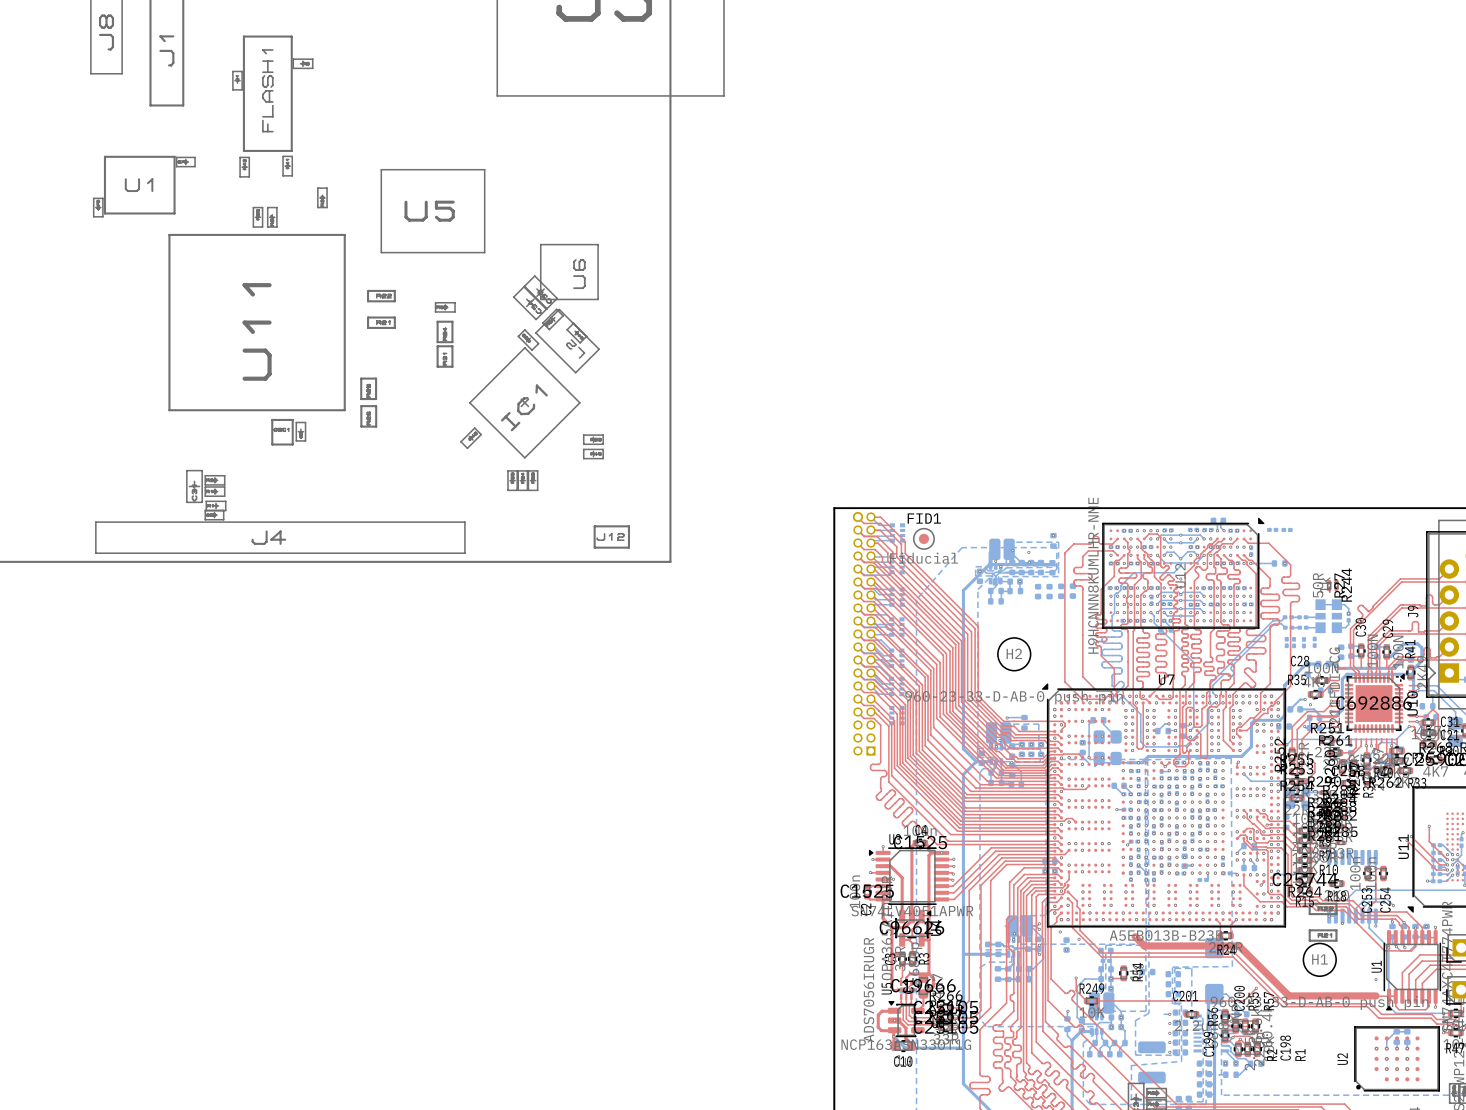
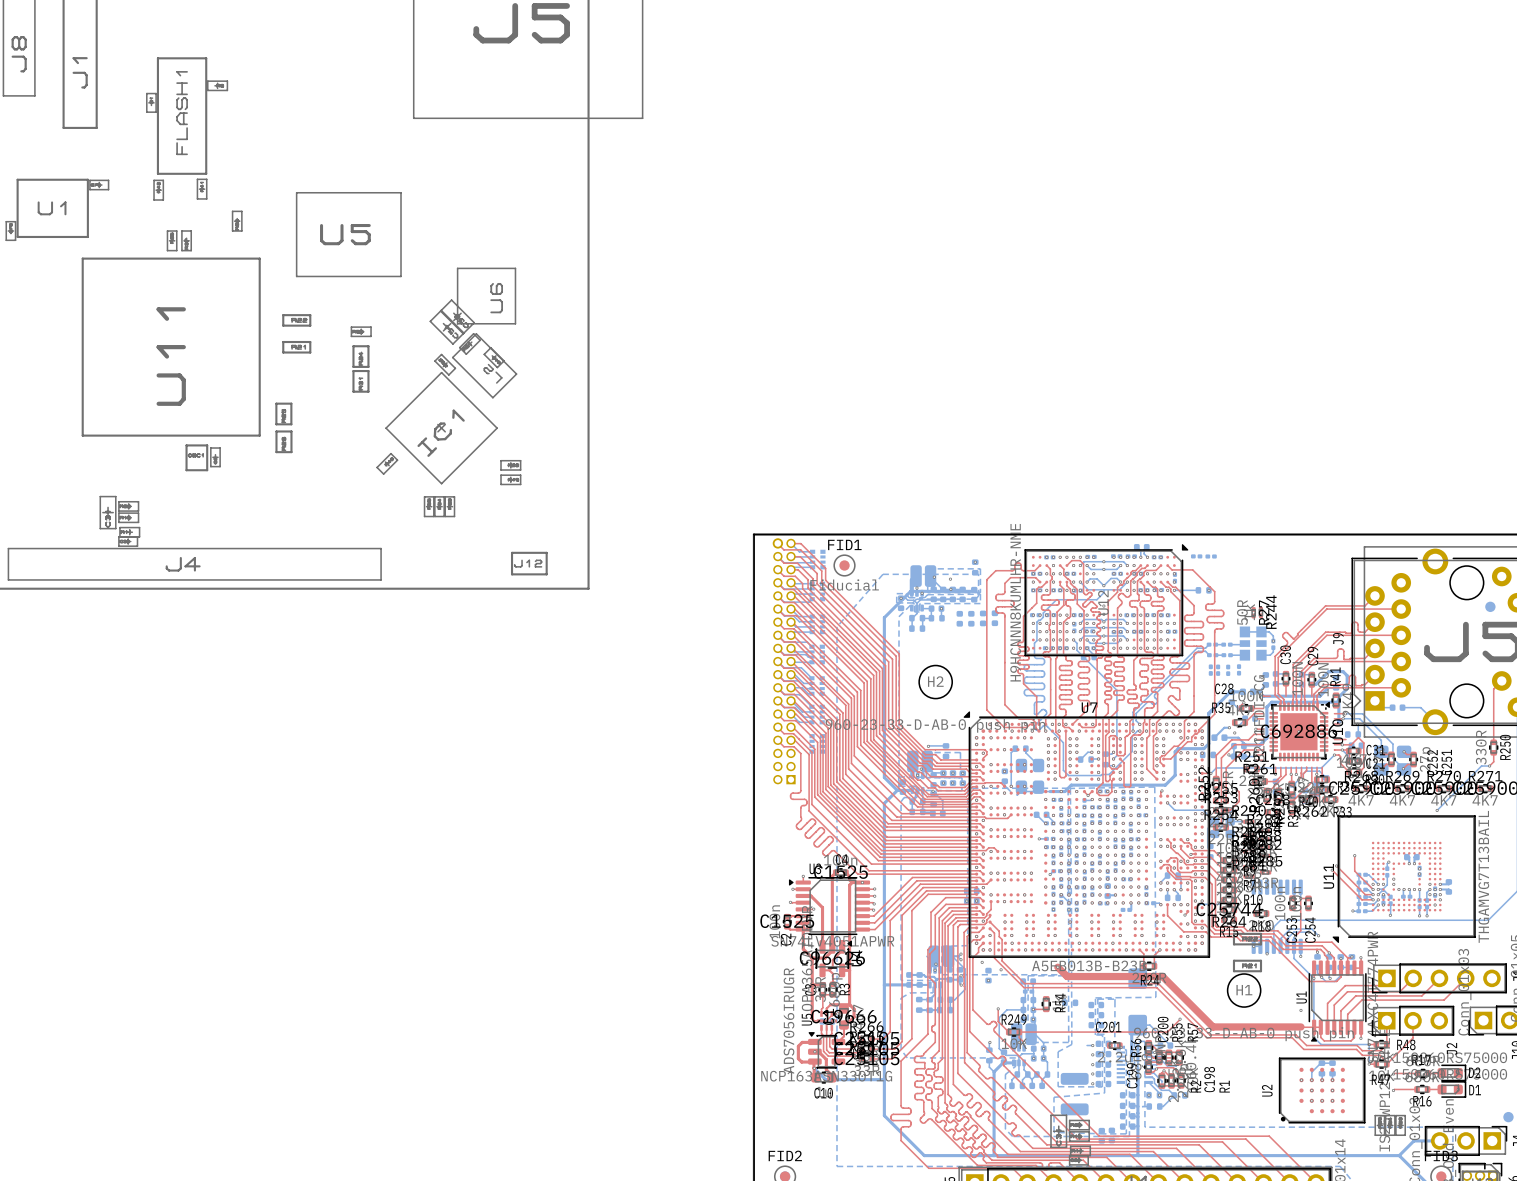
top track: none -> (1334, 739) (1345, 739)

